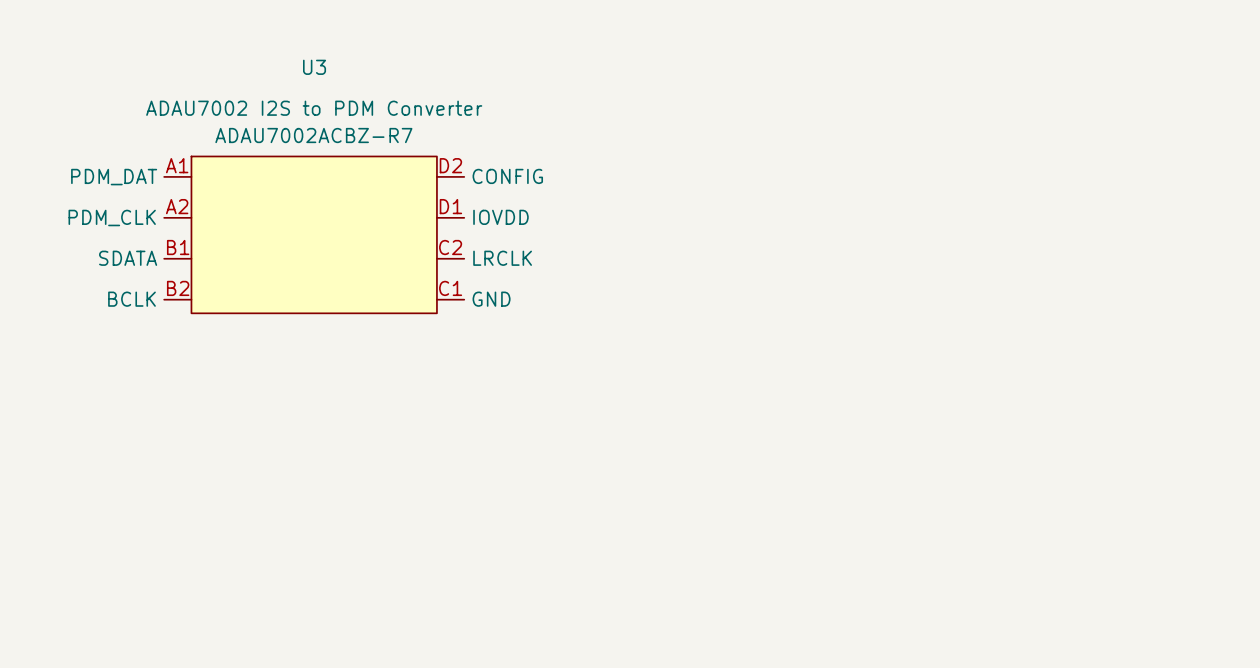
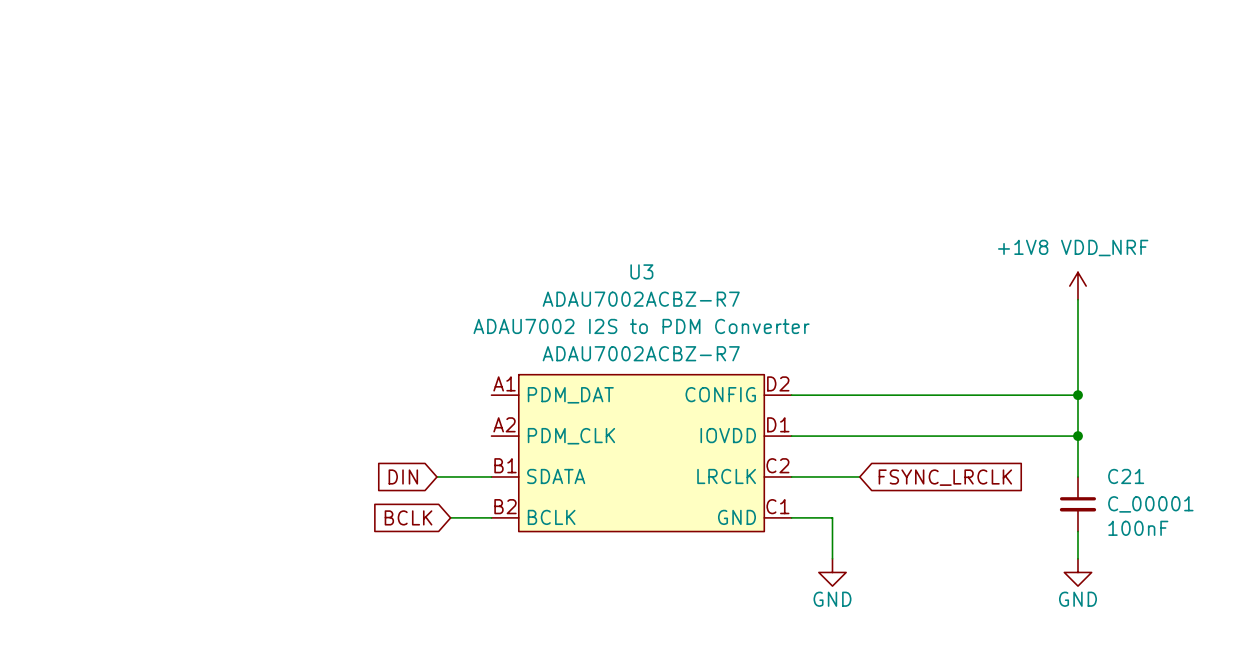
U3 symbol: [164, 156, 465, 314] -> [491, 374, 792, 532]
power symbol: none -> +1V8 VDD_NRF (1077, 286)
U3 value: none -> ADAU7002ACBZ-R7 (641, 299)
wire: none -> (1077, 299) (1077, 476)
wire: none -> (791, 395) (1077, 395)
junction: none -> (1077, 395)
wire: none -> (791, 436) (1077, 436)
junction: none -> (1077, 436)
global label: none -> DIN (403, 476)
wire: none -> (436, 476) (491, 476)
wire: none -> (791, 476) (859, 476)
global label: none -> FSYNC_LRCLK (945, 477)
C21: none -> C_00001 (1077, 504)
global label: none -> BCLK (408, 517)
wire: none -> (450, 517) (491, 517)
wire: none -> (791, 517) (832, 517) (832, 558)
wire: none -> (1077, 531) (1077, 558)
power symbol: none -> GND (832, 572)
power symbol: none -> GND (1077, 572)

